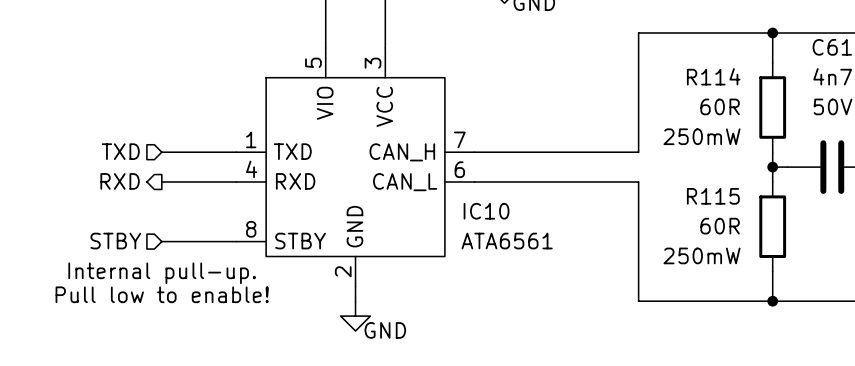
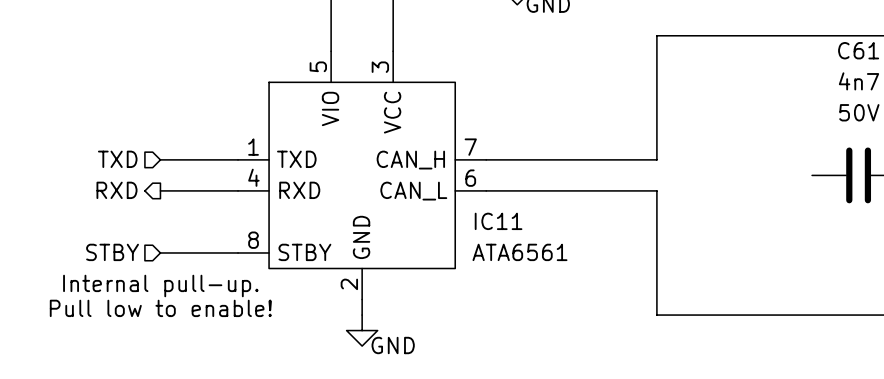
wire: (772, 33) (772, 62) -> none
junction: (772, 33) -> none
R114: 60R (772, 107) -> none
wire: (772, 152) (772, 182) -> none
wire: (772, 167) (787, 167) -> none
junction: (772, 167) -> none
IC10 name: IC10 (486, 211) -> IC11 (498, 221)
R115: 60R (772, 226) -> none
wire: (772, 271) (772, 301) -> none
junction: (772, 301) -> none

